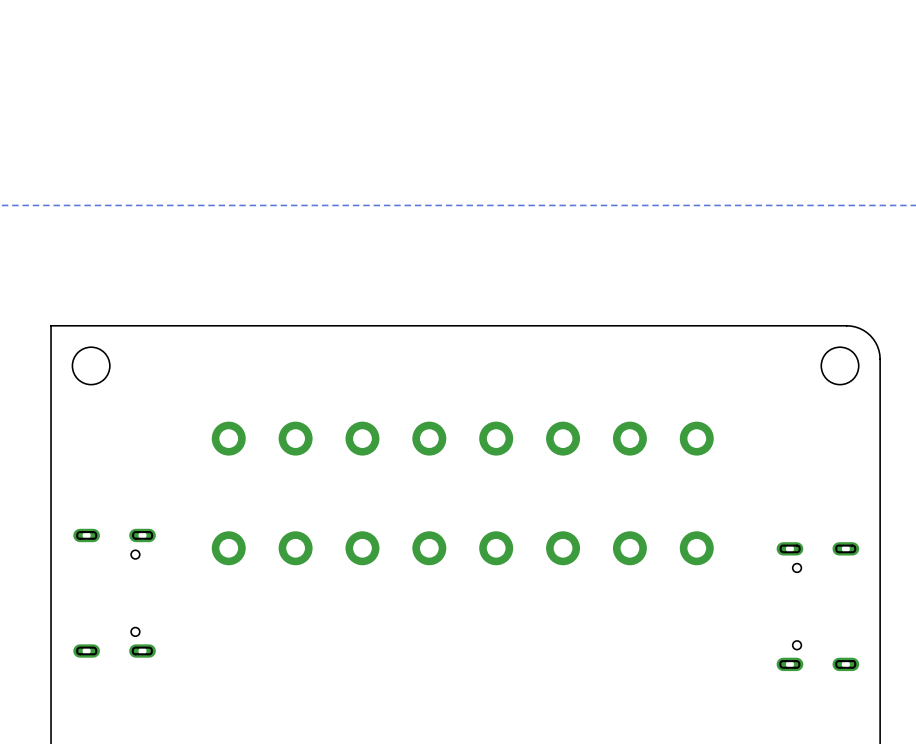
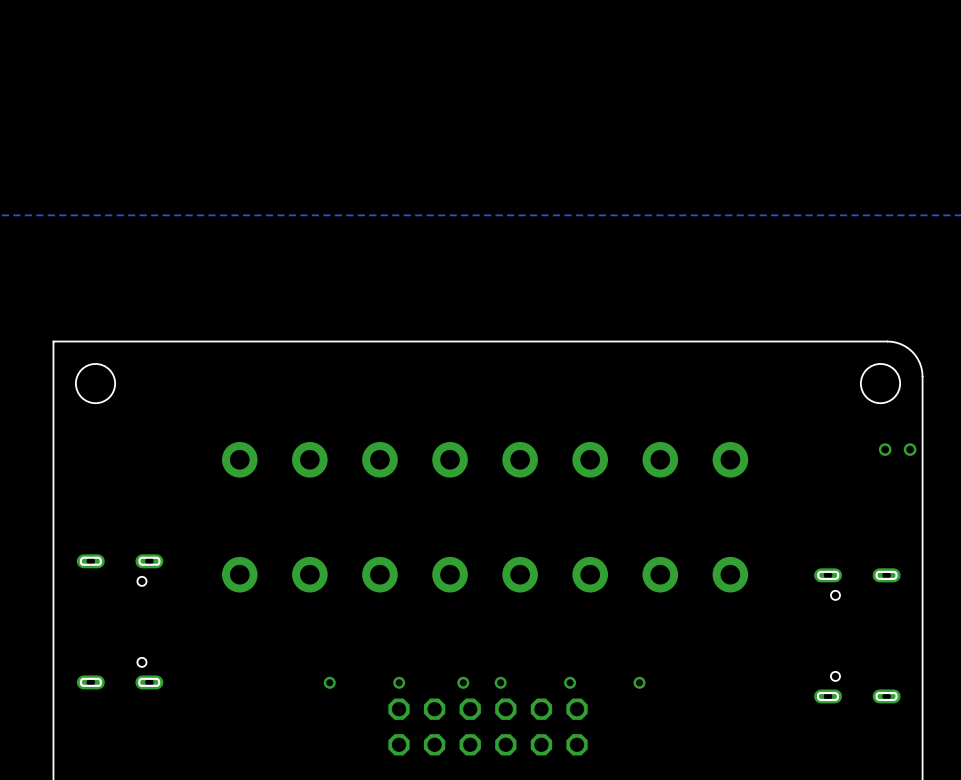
via: none -> (885, 449)
via: none -> (910, 449)
via: none -> (329, 682)
via: none -> (399, 682)
via: none -> (463, 682)
via: none -> (500, 682)
via: none -> (570, 682)
via: none -> (639, 682)
part: none -> (488, 726)

